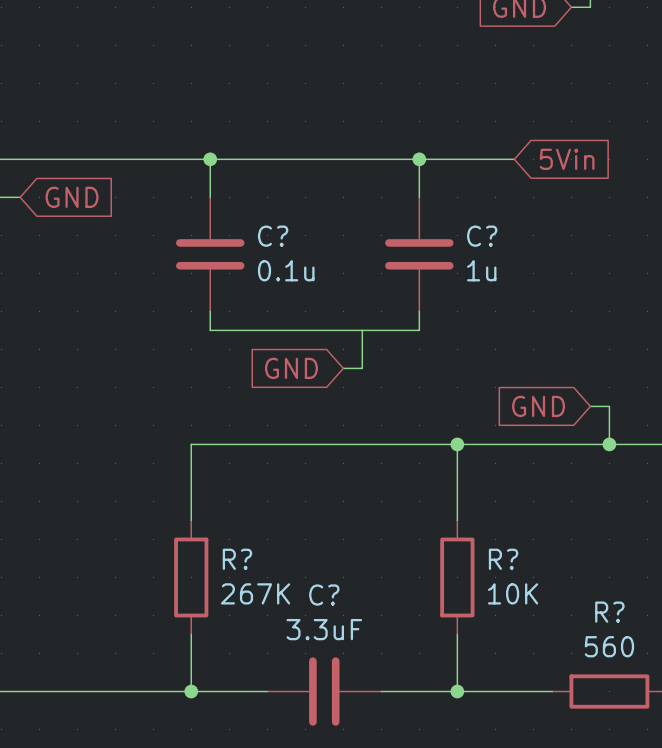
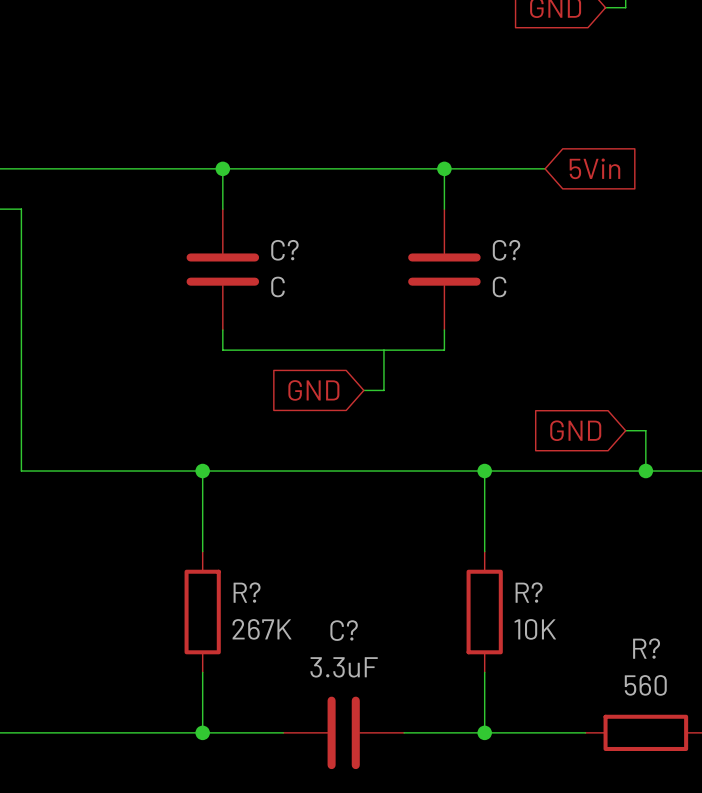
wire: none -> (21, 209) (21, 471) (202, 471)
global label: GND (72, 197) -> none
C? value: 0.1u (286, 270) -> C (277, 286)
C? value: 1u (481, 270) -> C (499, 286)
junction: none -> (202, 471)

